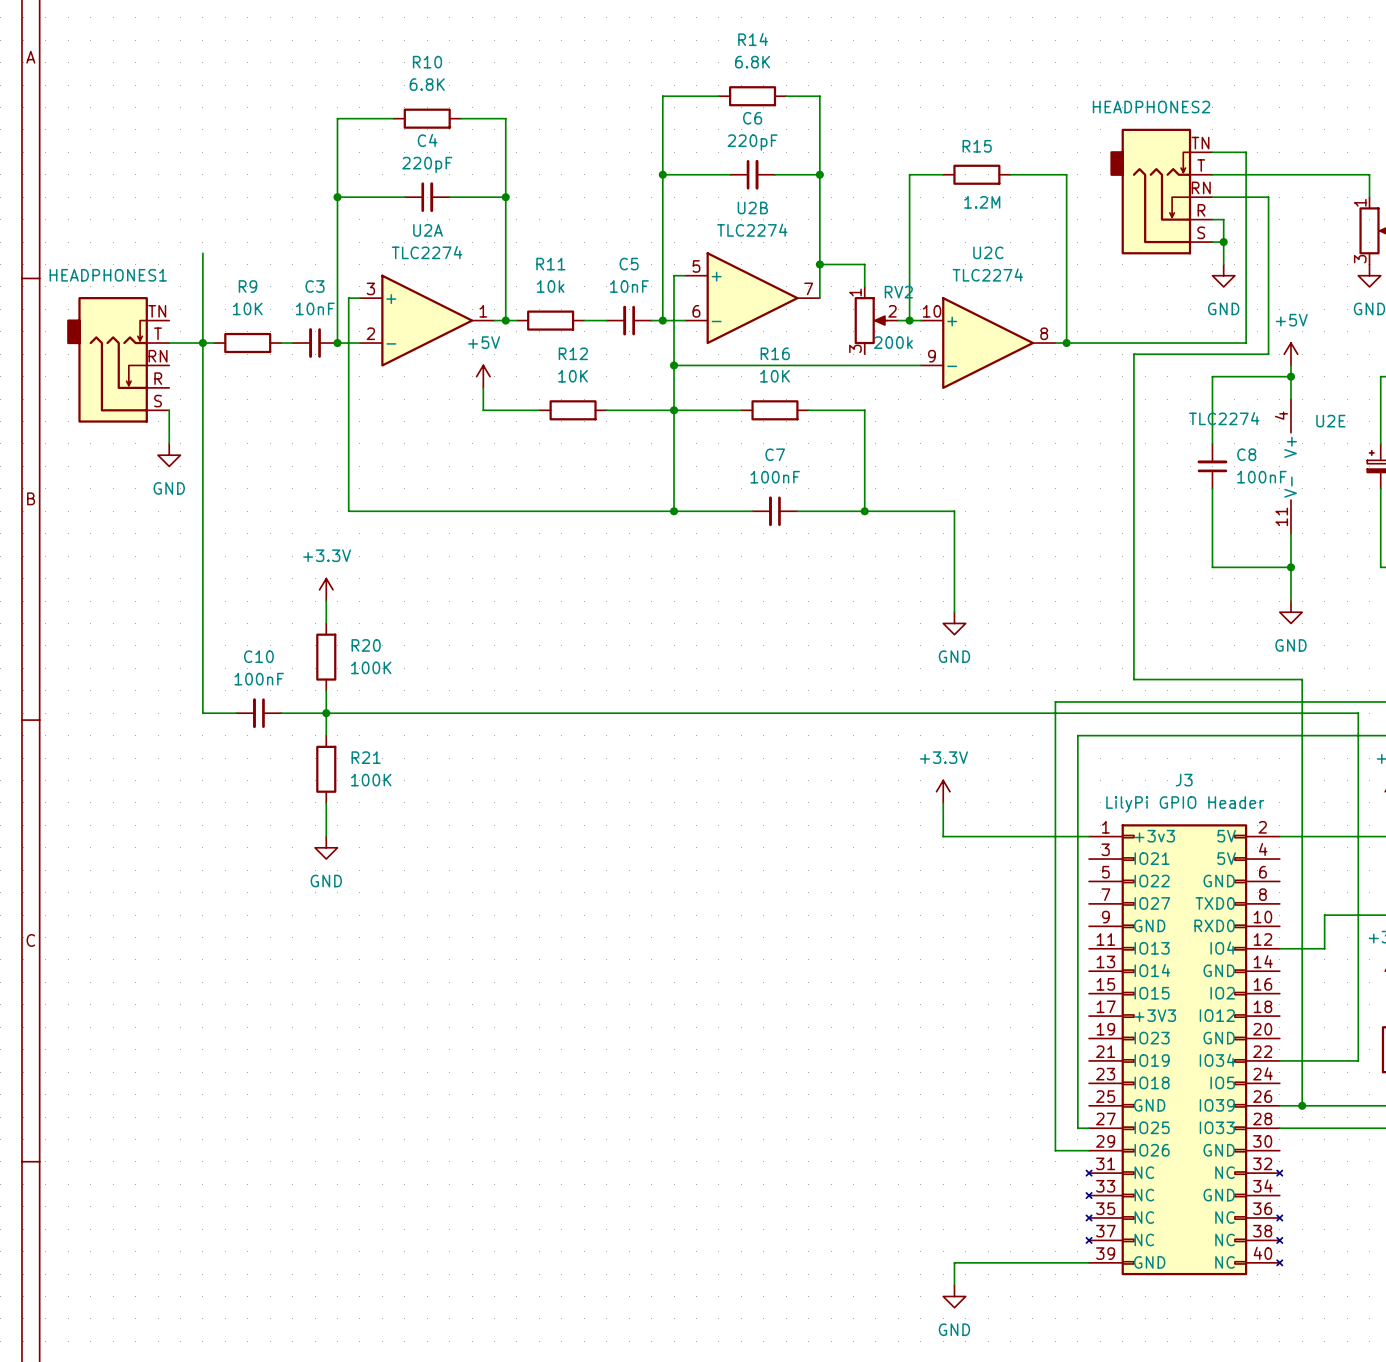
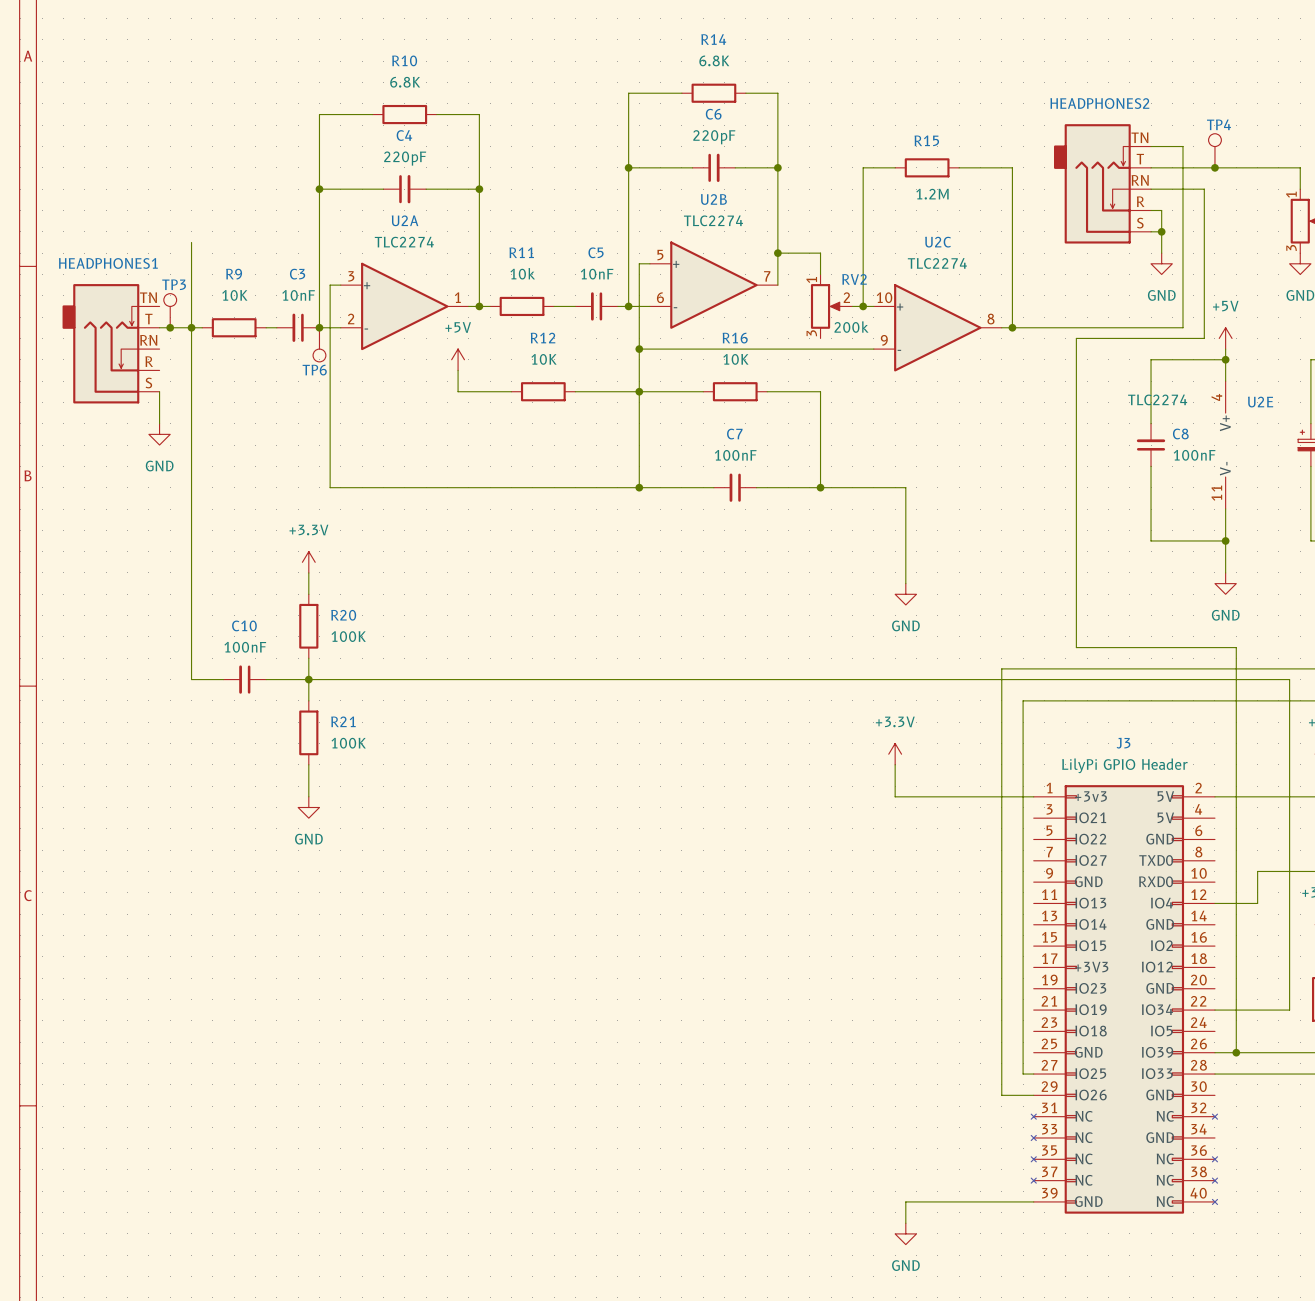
TP4: none -> (1214, 150)
junction: none -> (1214, 167)
TP3: none -> (170, 310)
junction: none -> (170, 327)
TP6: none -> (319, 344)

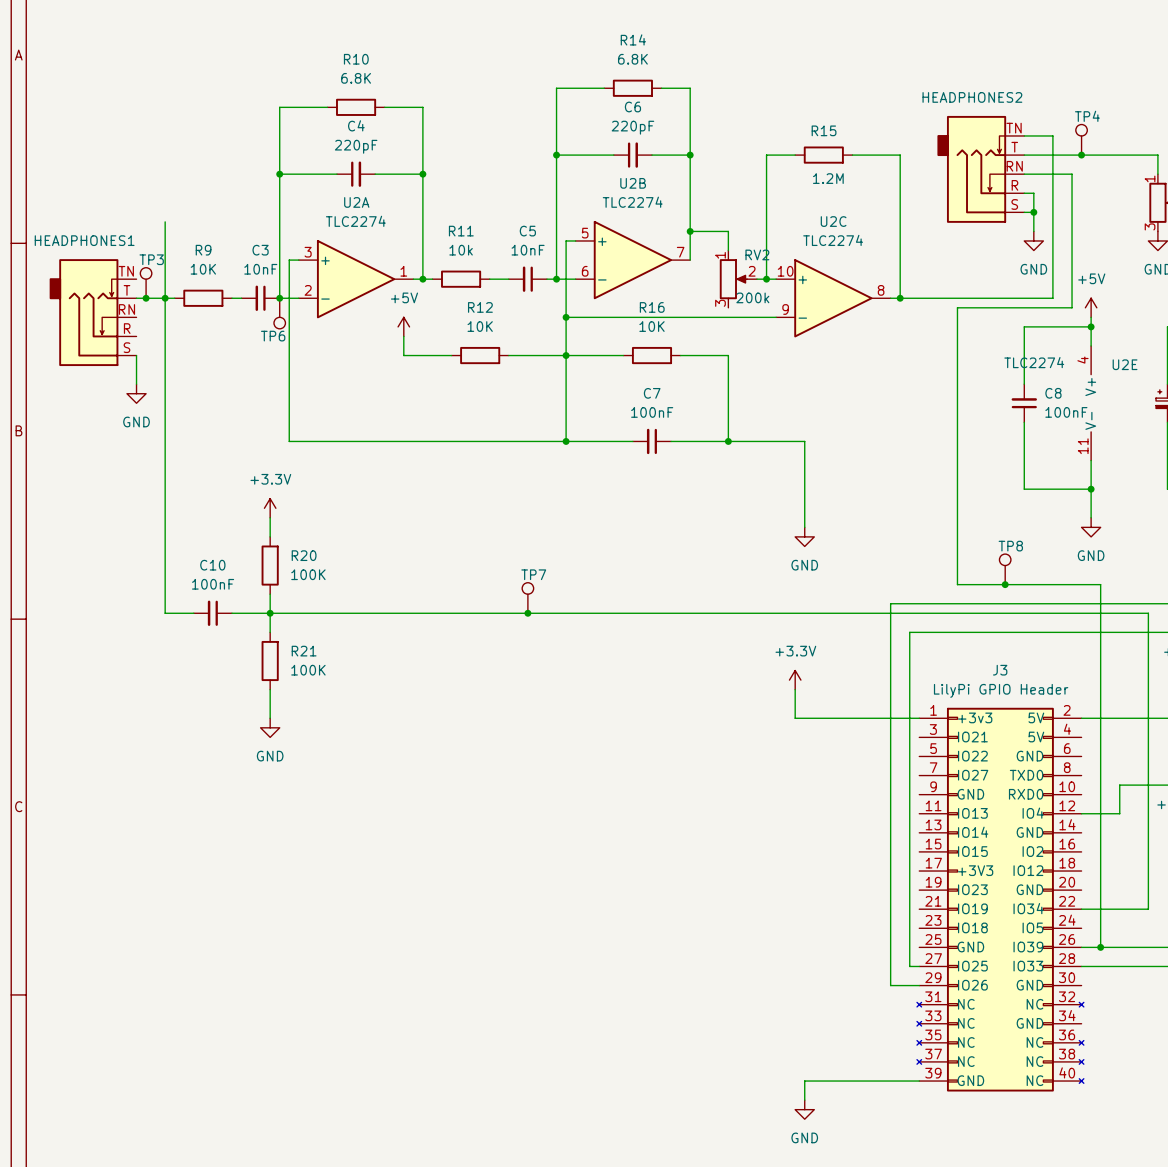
TP8: none -> (1005, 569)
junction: none -> (1005, 584)
TP7: none -> (527, 598)
junction: none -> (527, 613)

